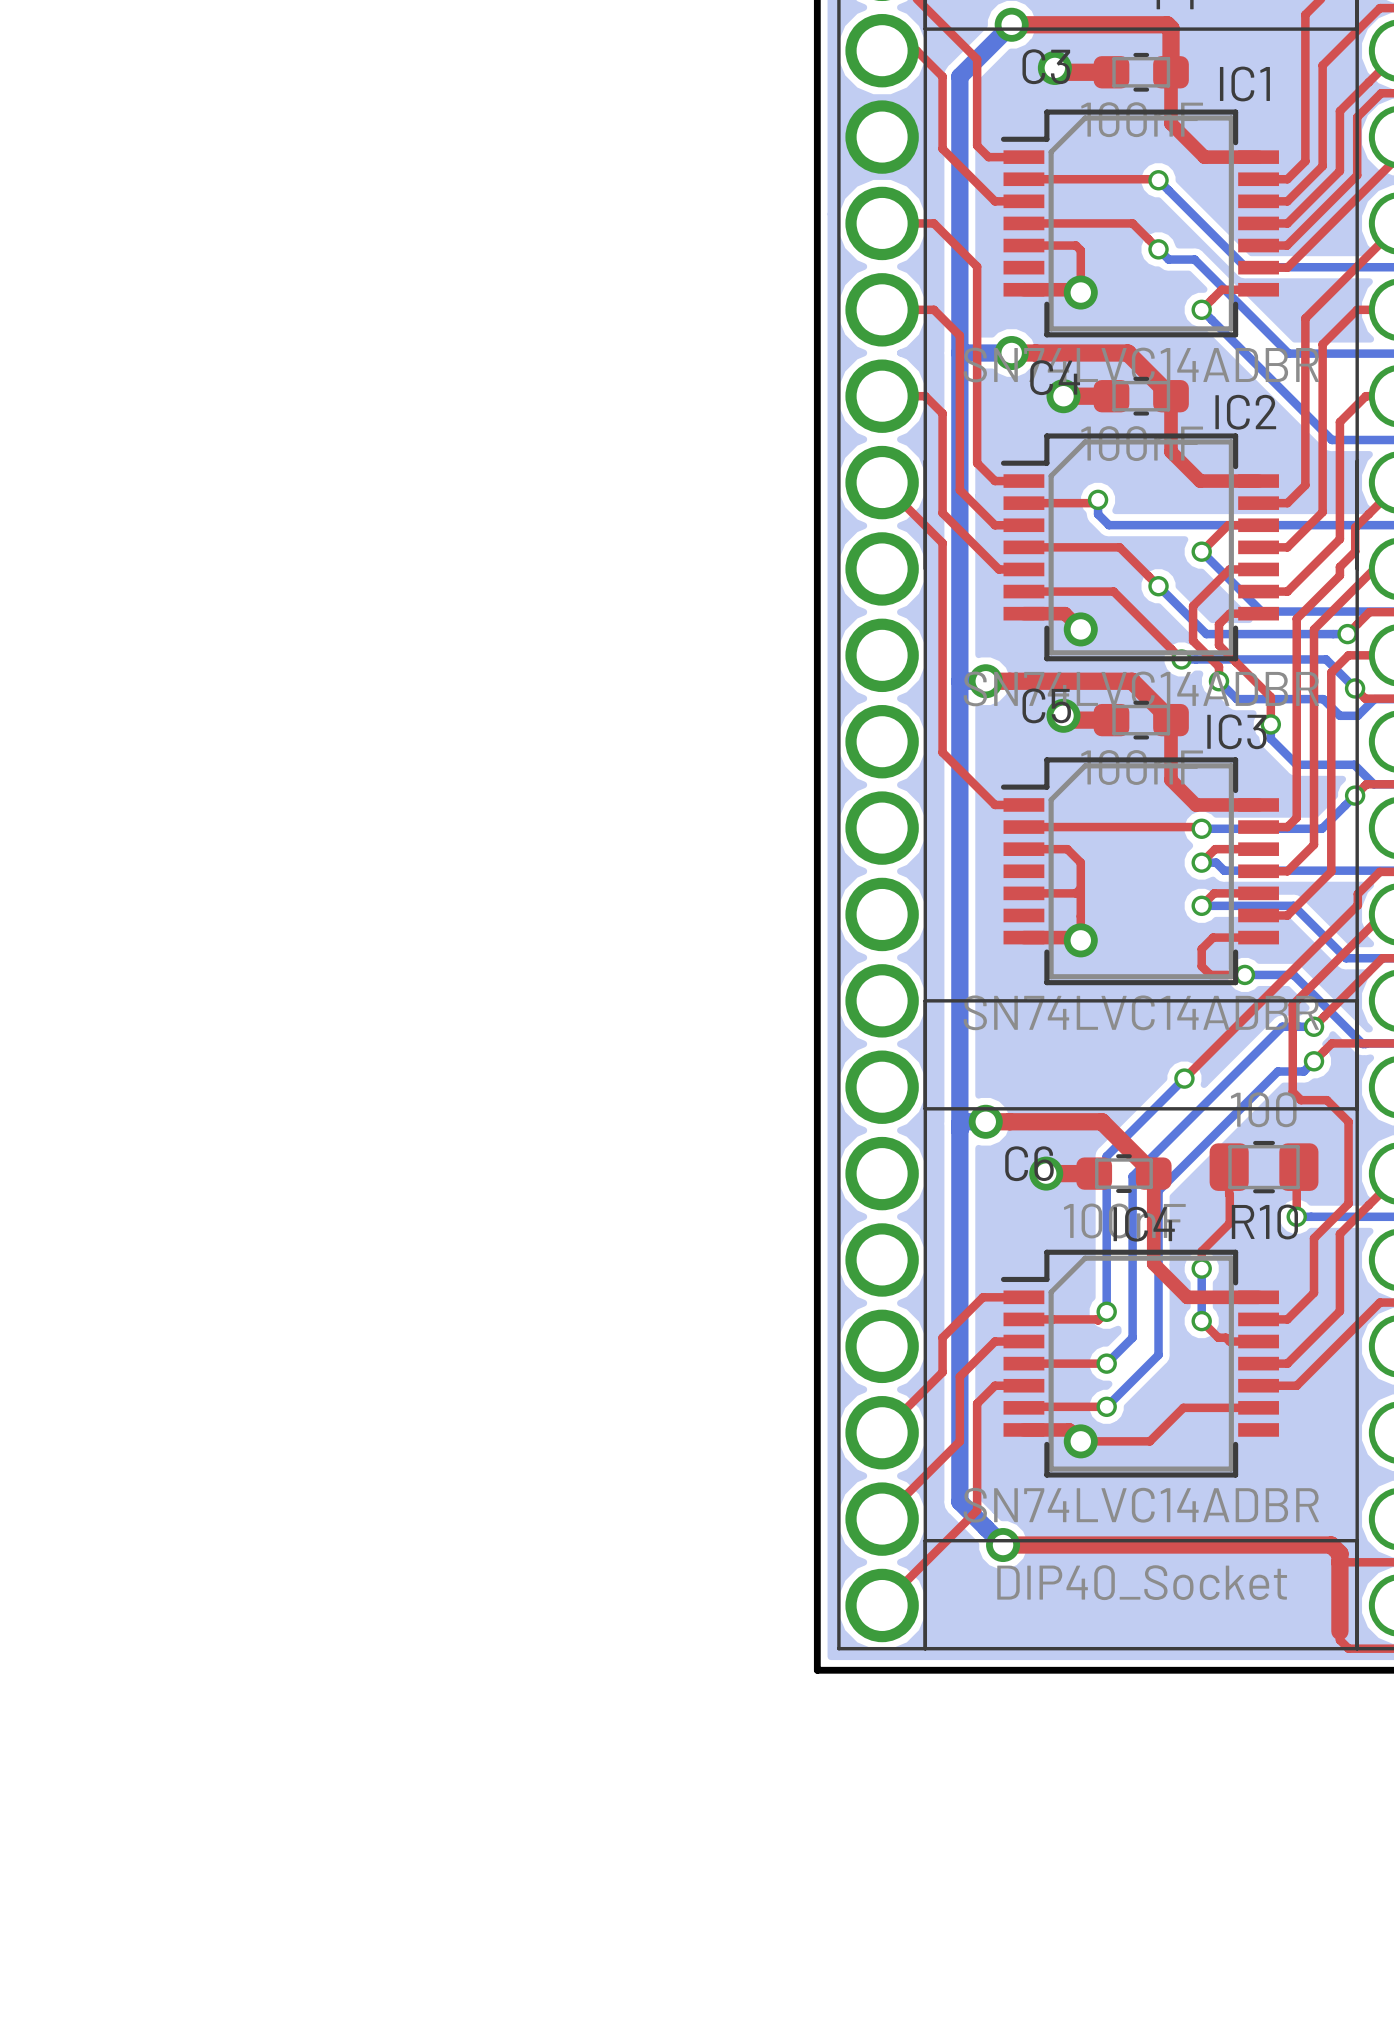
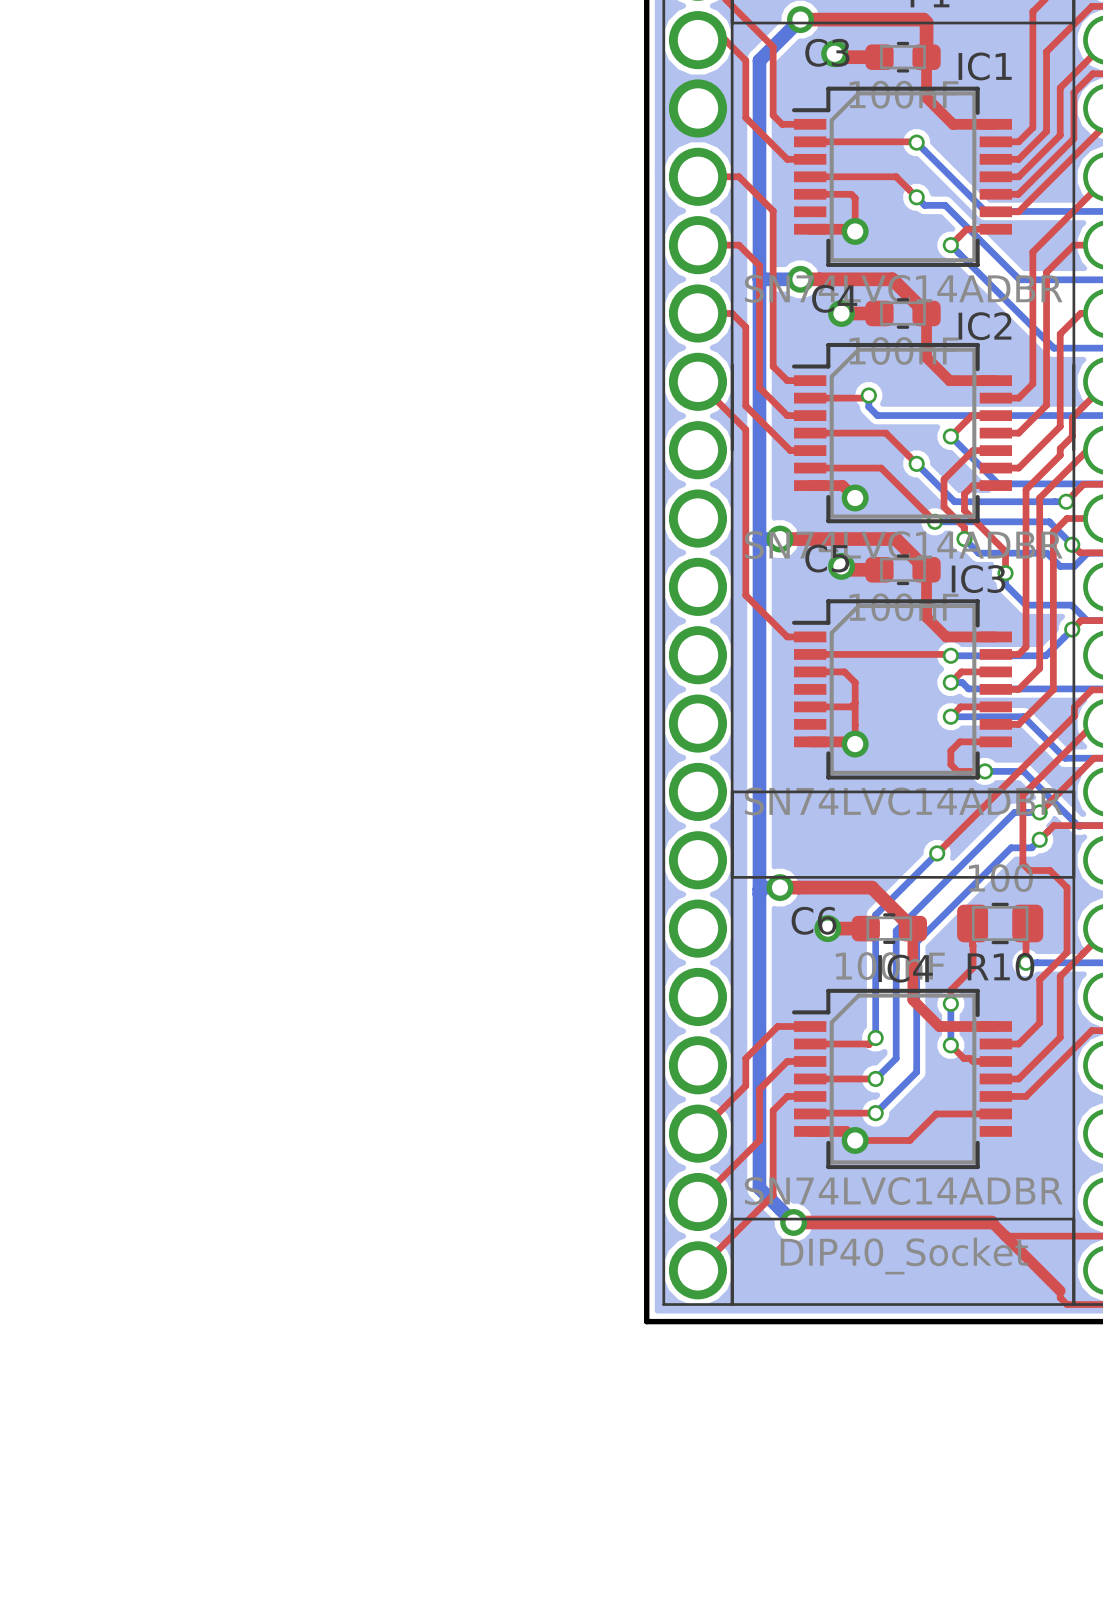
top track: (1253, 1545) (1331, 1545) (1339, 1553) (1339, 1631) -> (991, 1222) (1060, 1290)
top track: none -> (1005, 1236) (1060, 1236)

